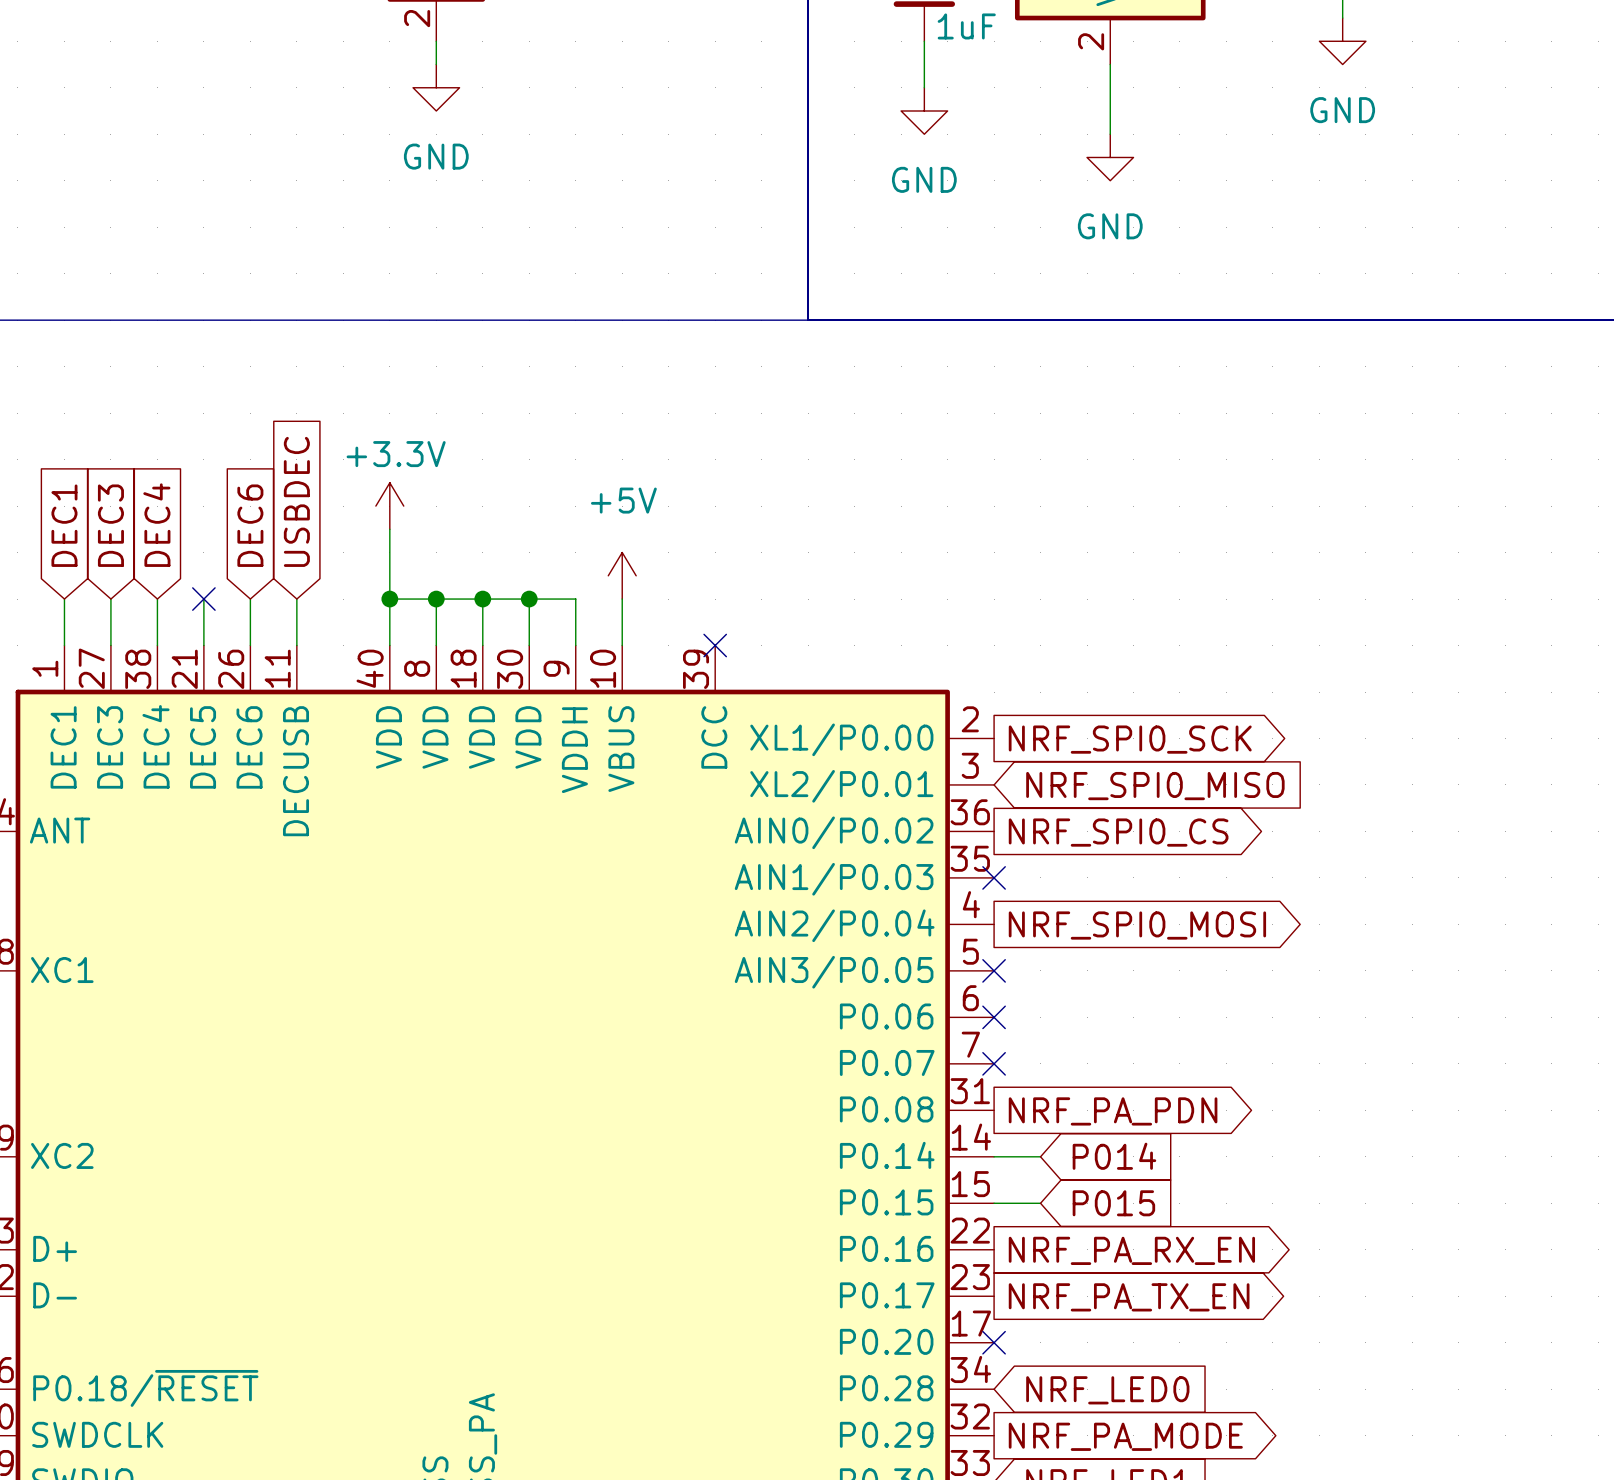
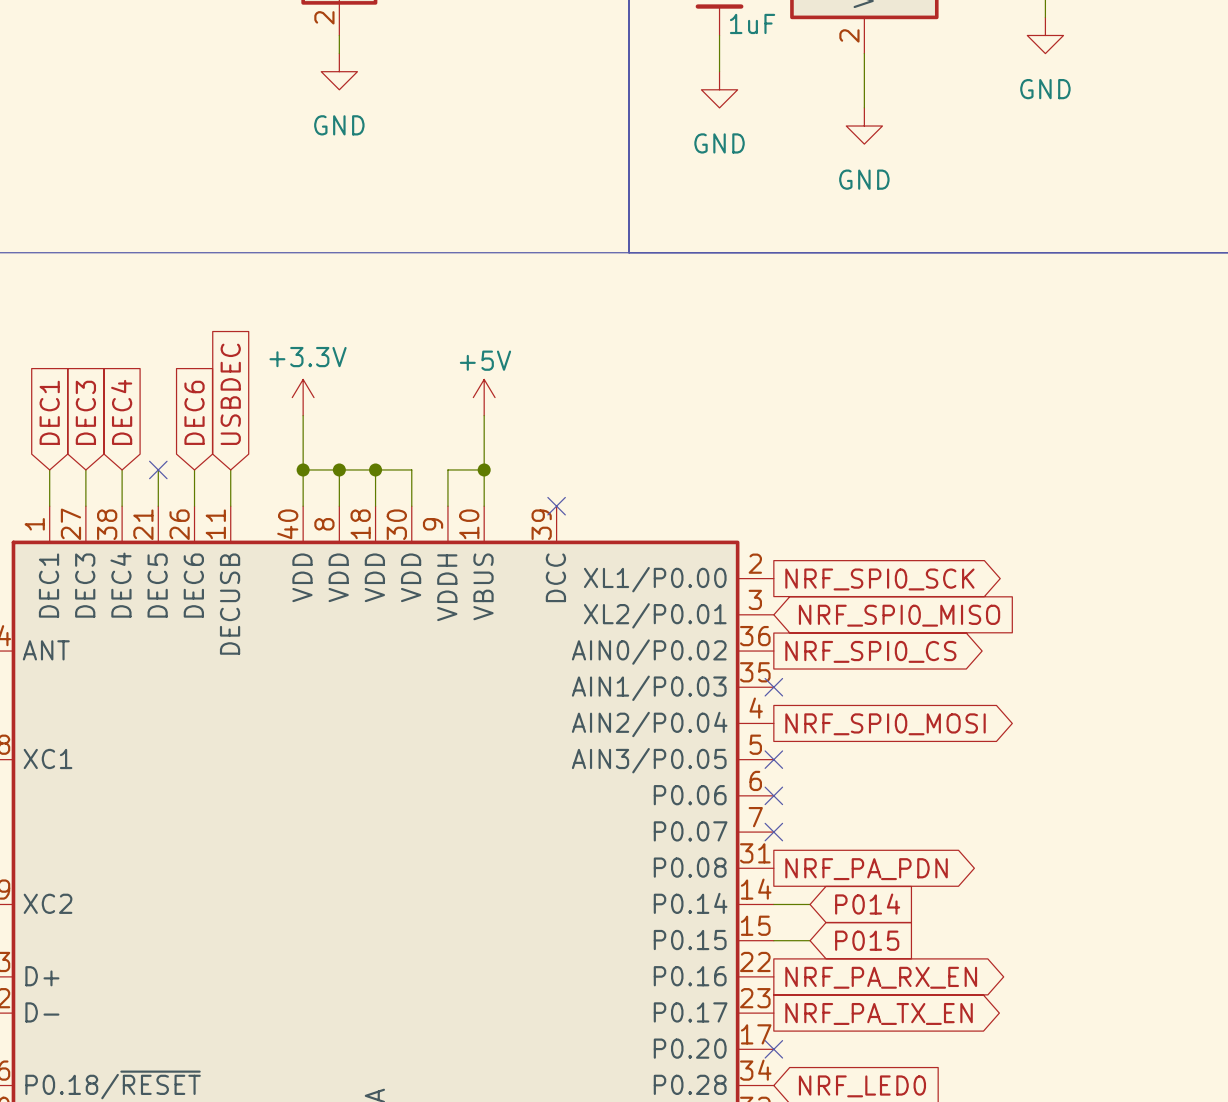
power symbol text position: +5V (623, 500) -> +5V (485, 360)
power symbol position: +5V (622, 575) -> +5V (484, 397)
wire: (529, 599) (575, 599) -> (484, 415) (484, 469) (447, 469)
junction position: (529, 599) -> (484, 469)

